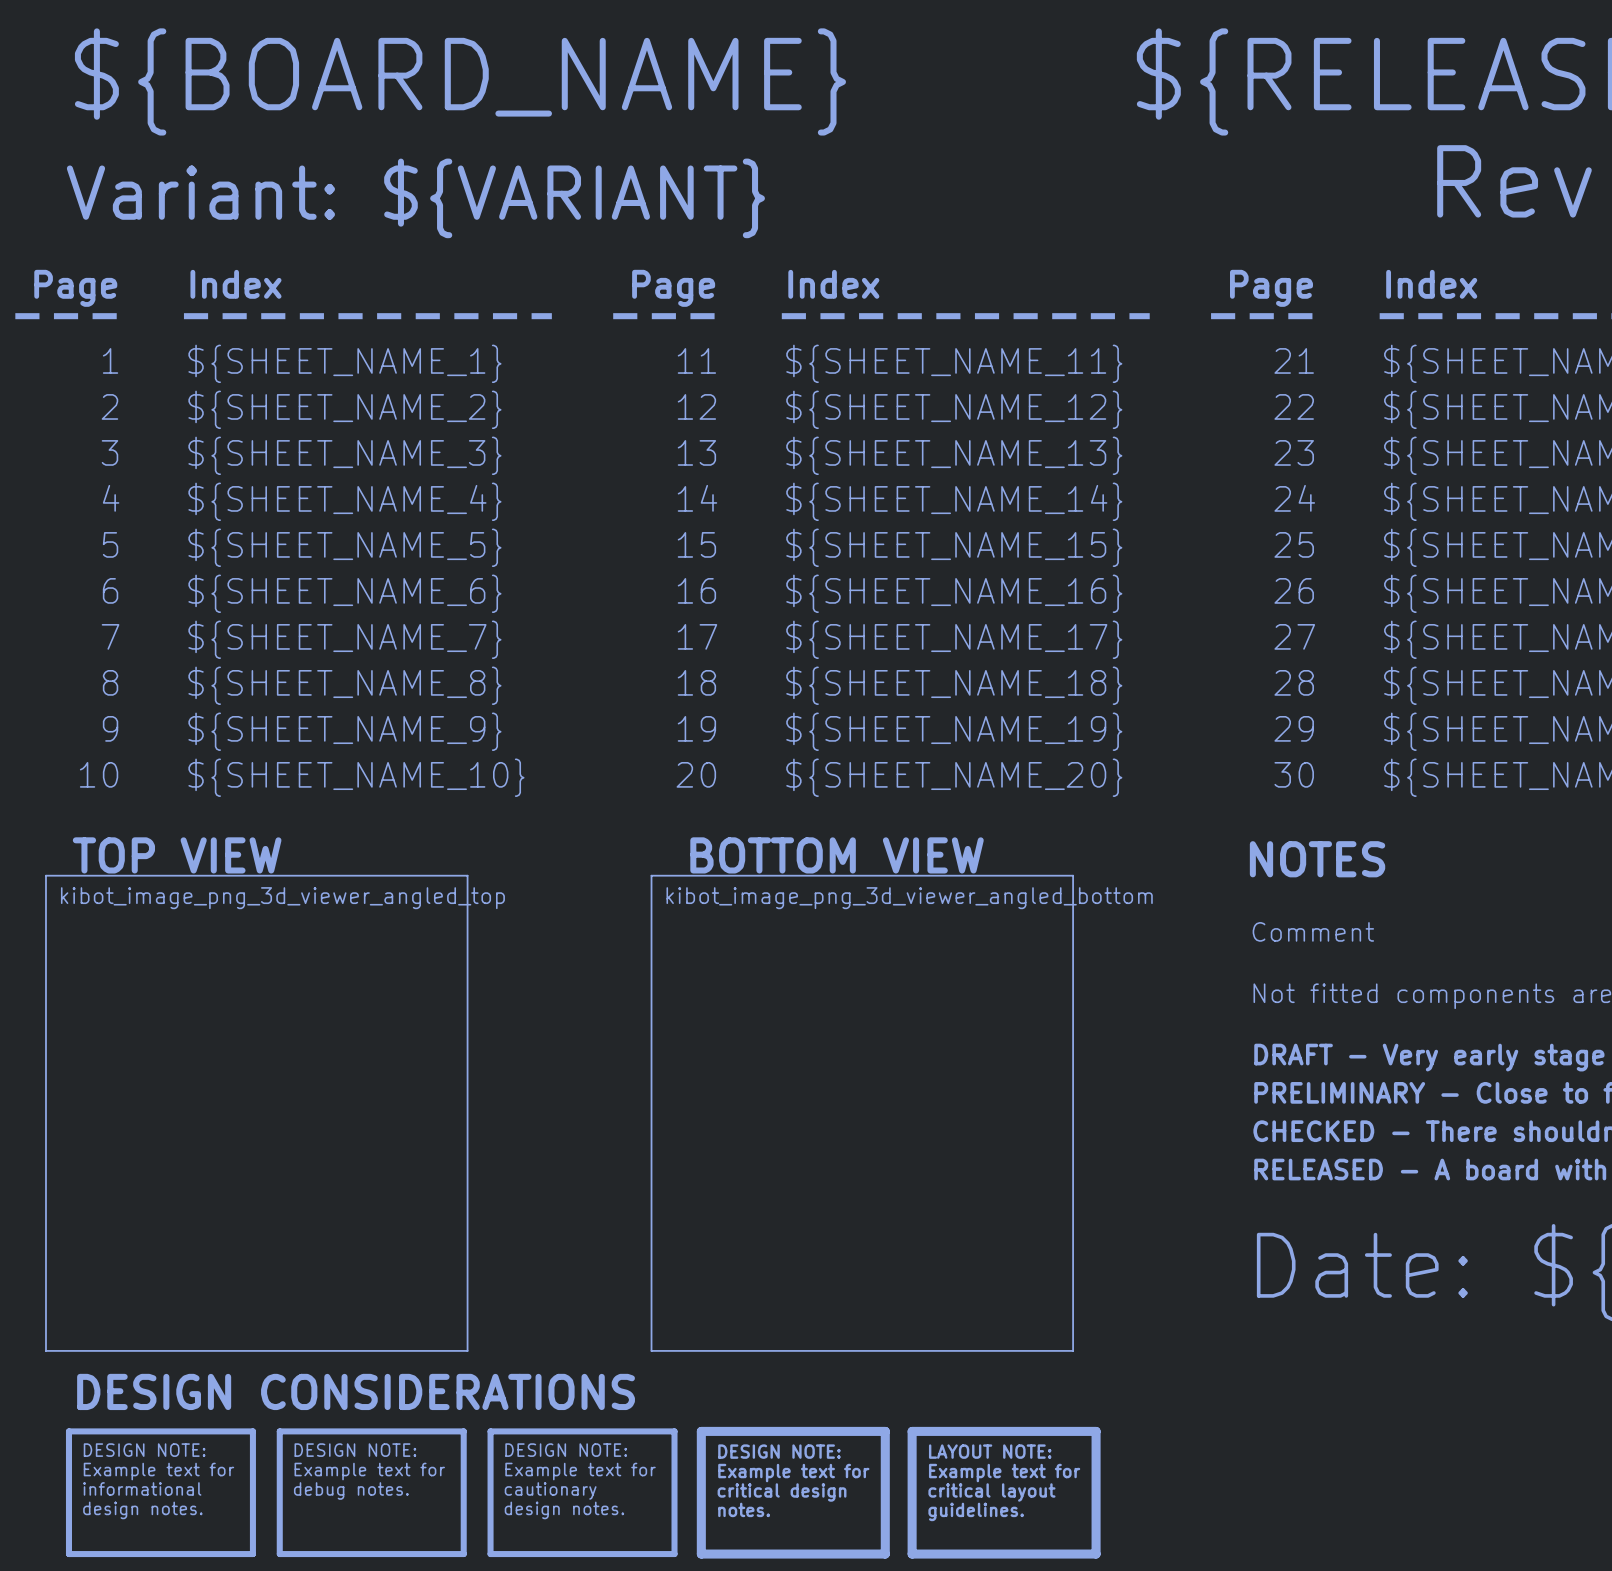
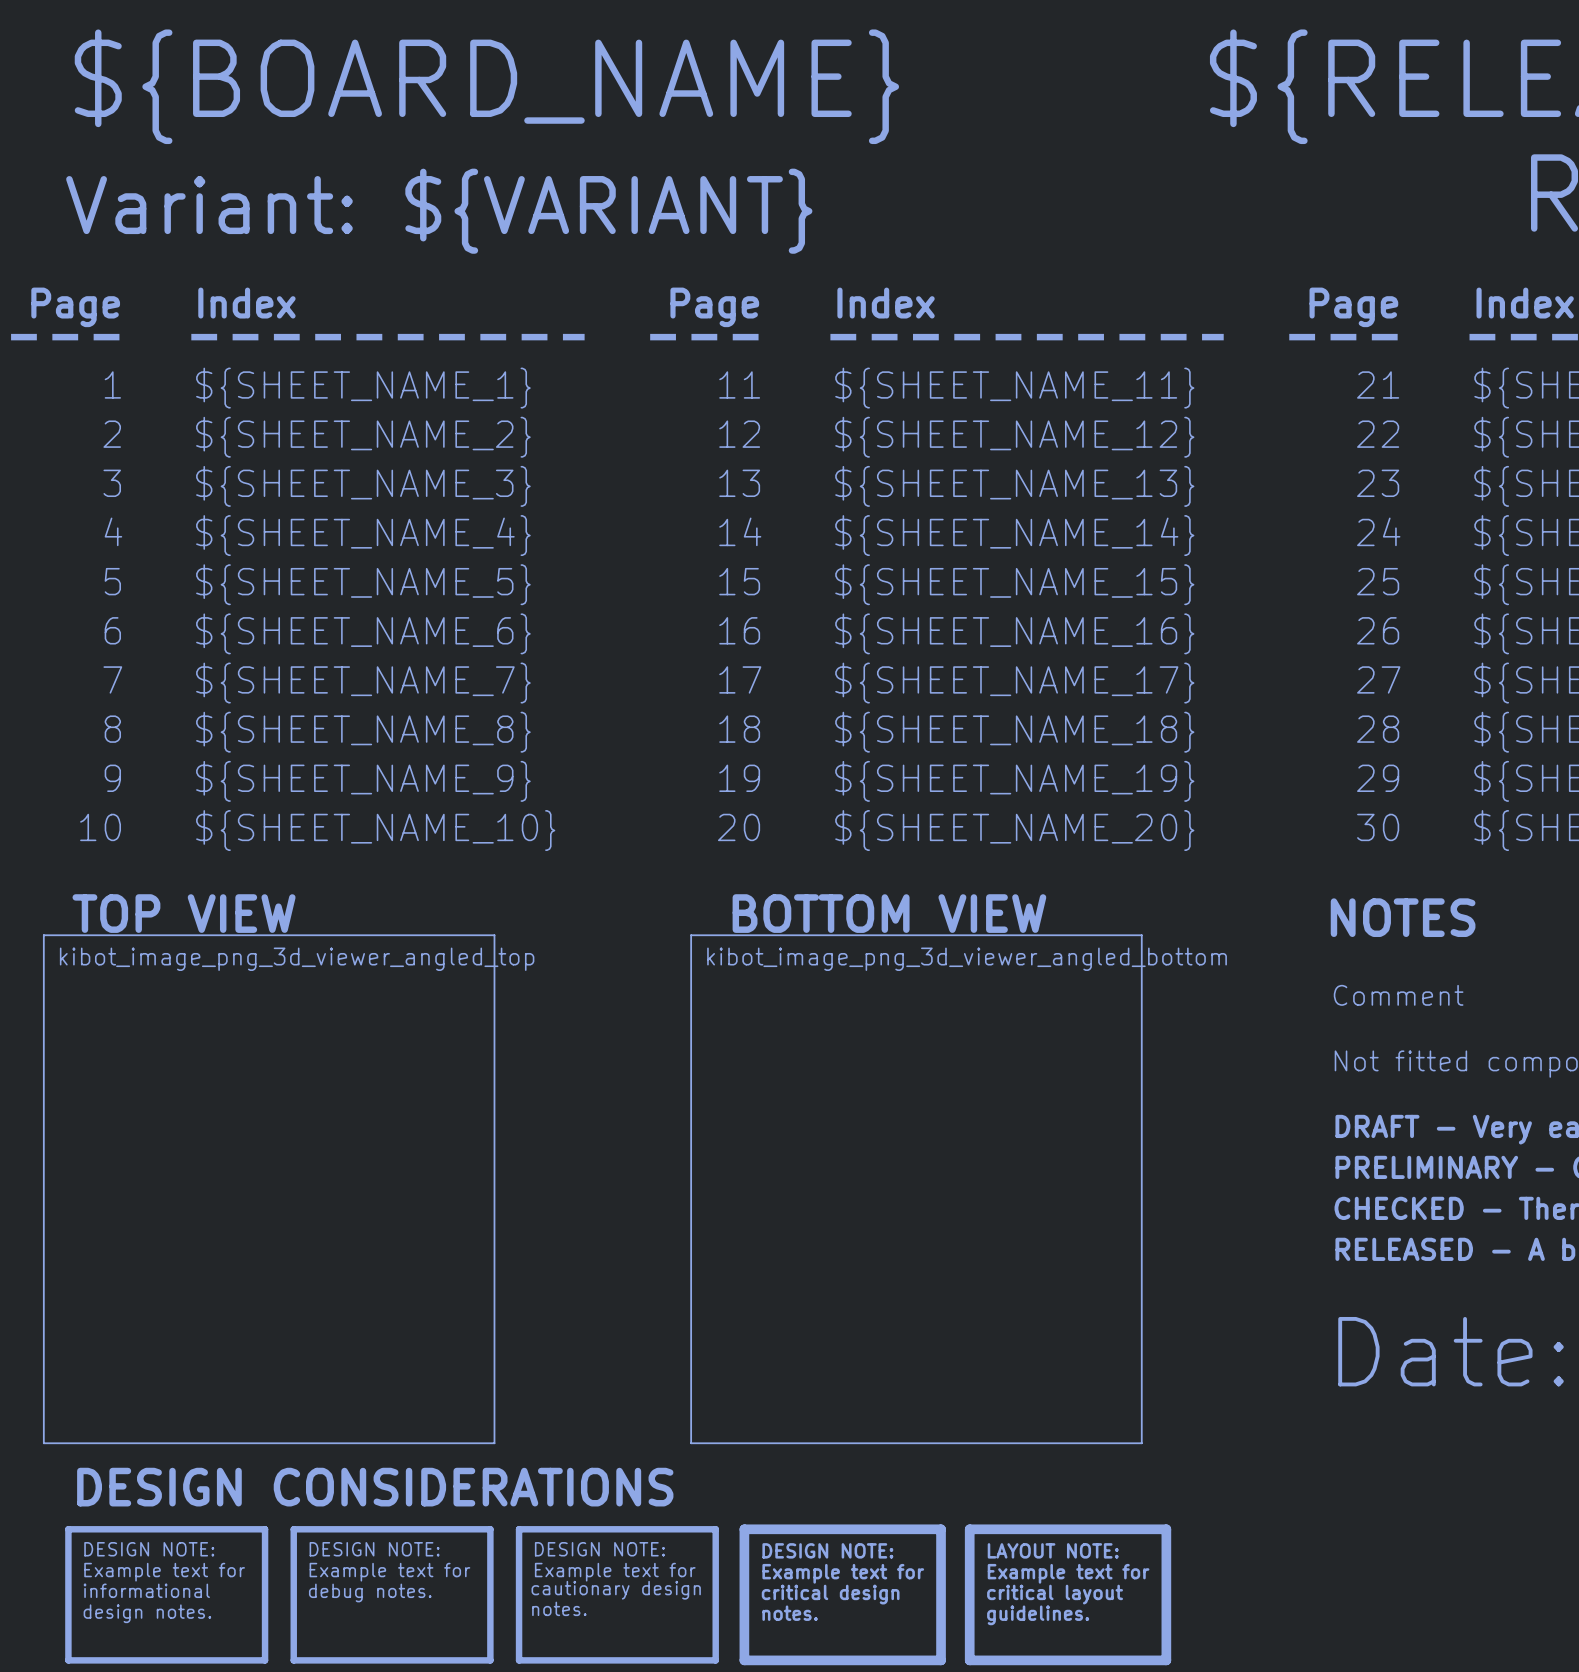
text: cautionary (550, 1490) -> cautionary design (616, 1590)
text: design notes. (564, 1510) -> notes. (559, 1608)

